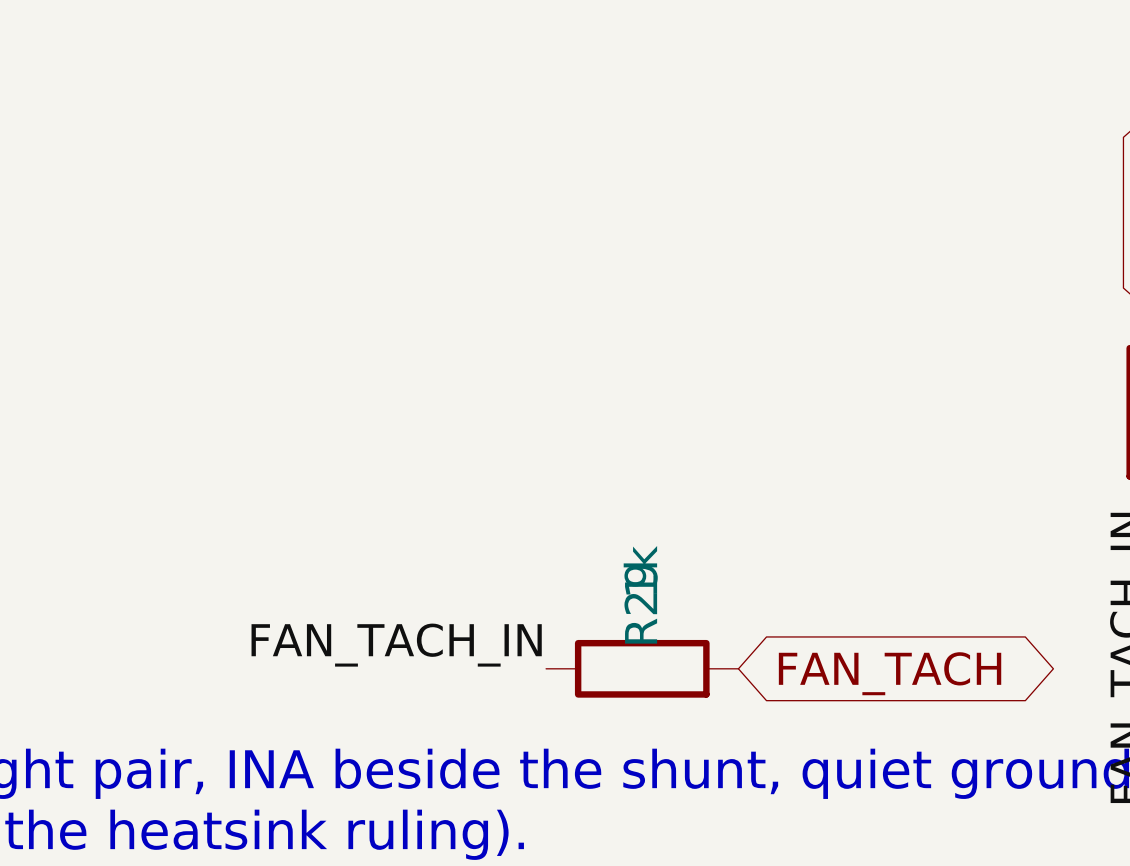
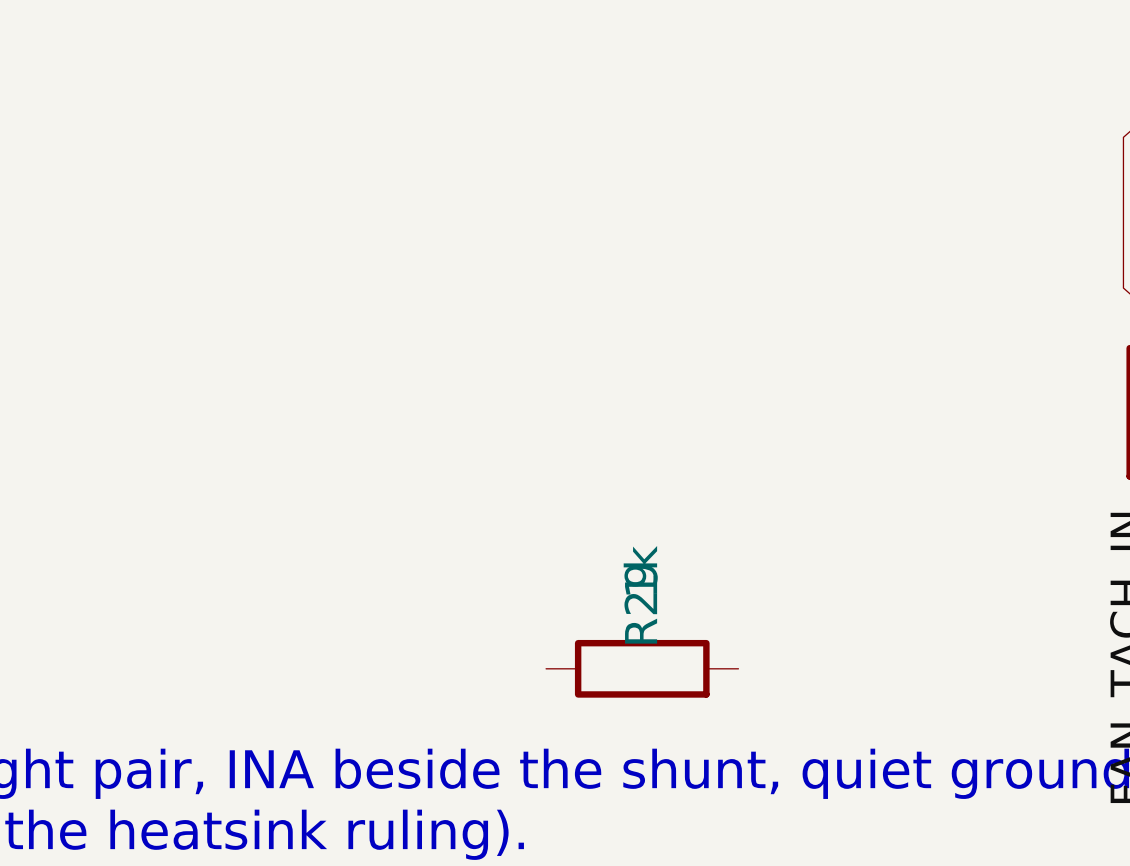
label: FAN_TACH_IN (396, 645) -> none
global label: FAN_TACH (890, 673) -> none

